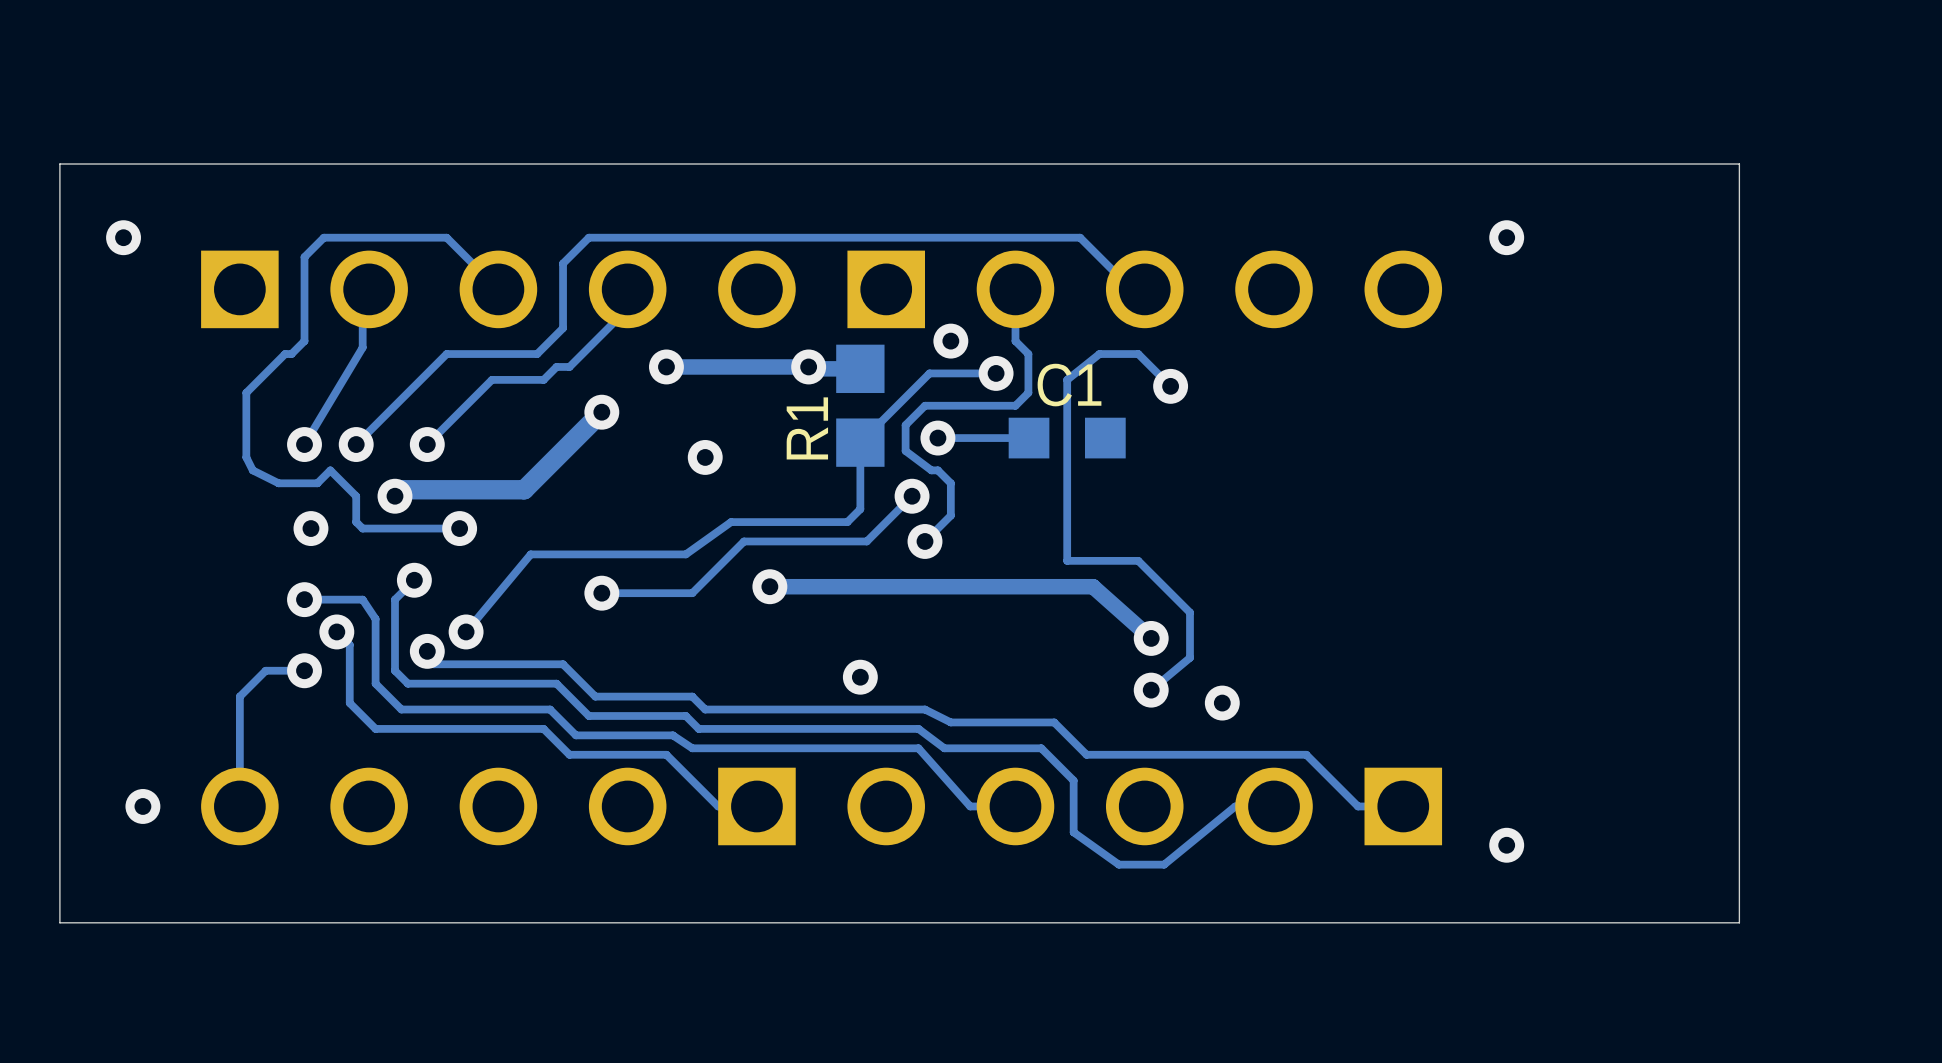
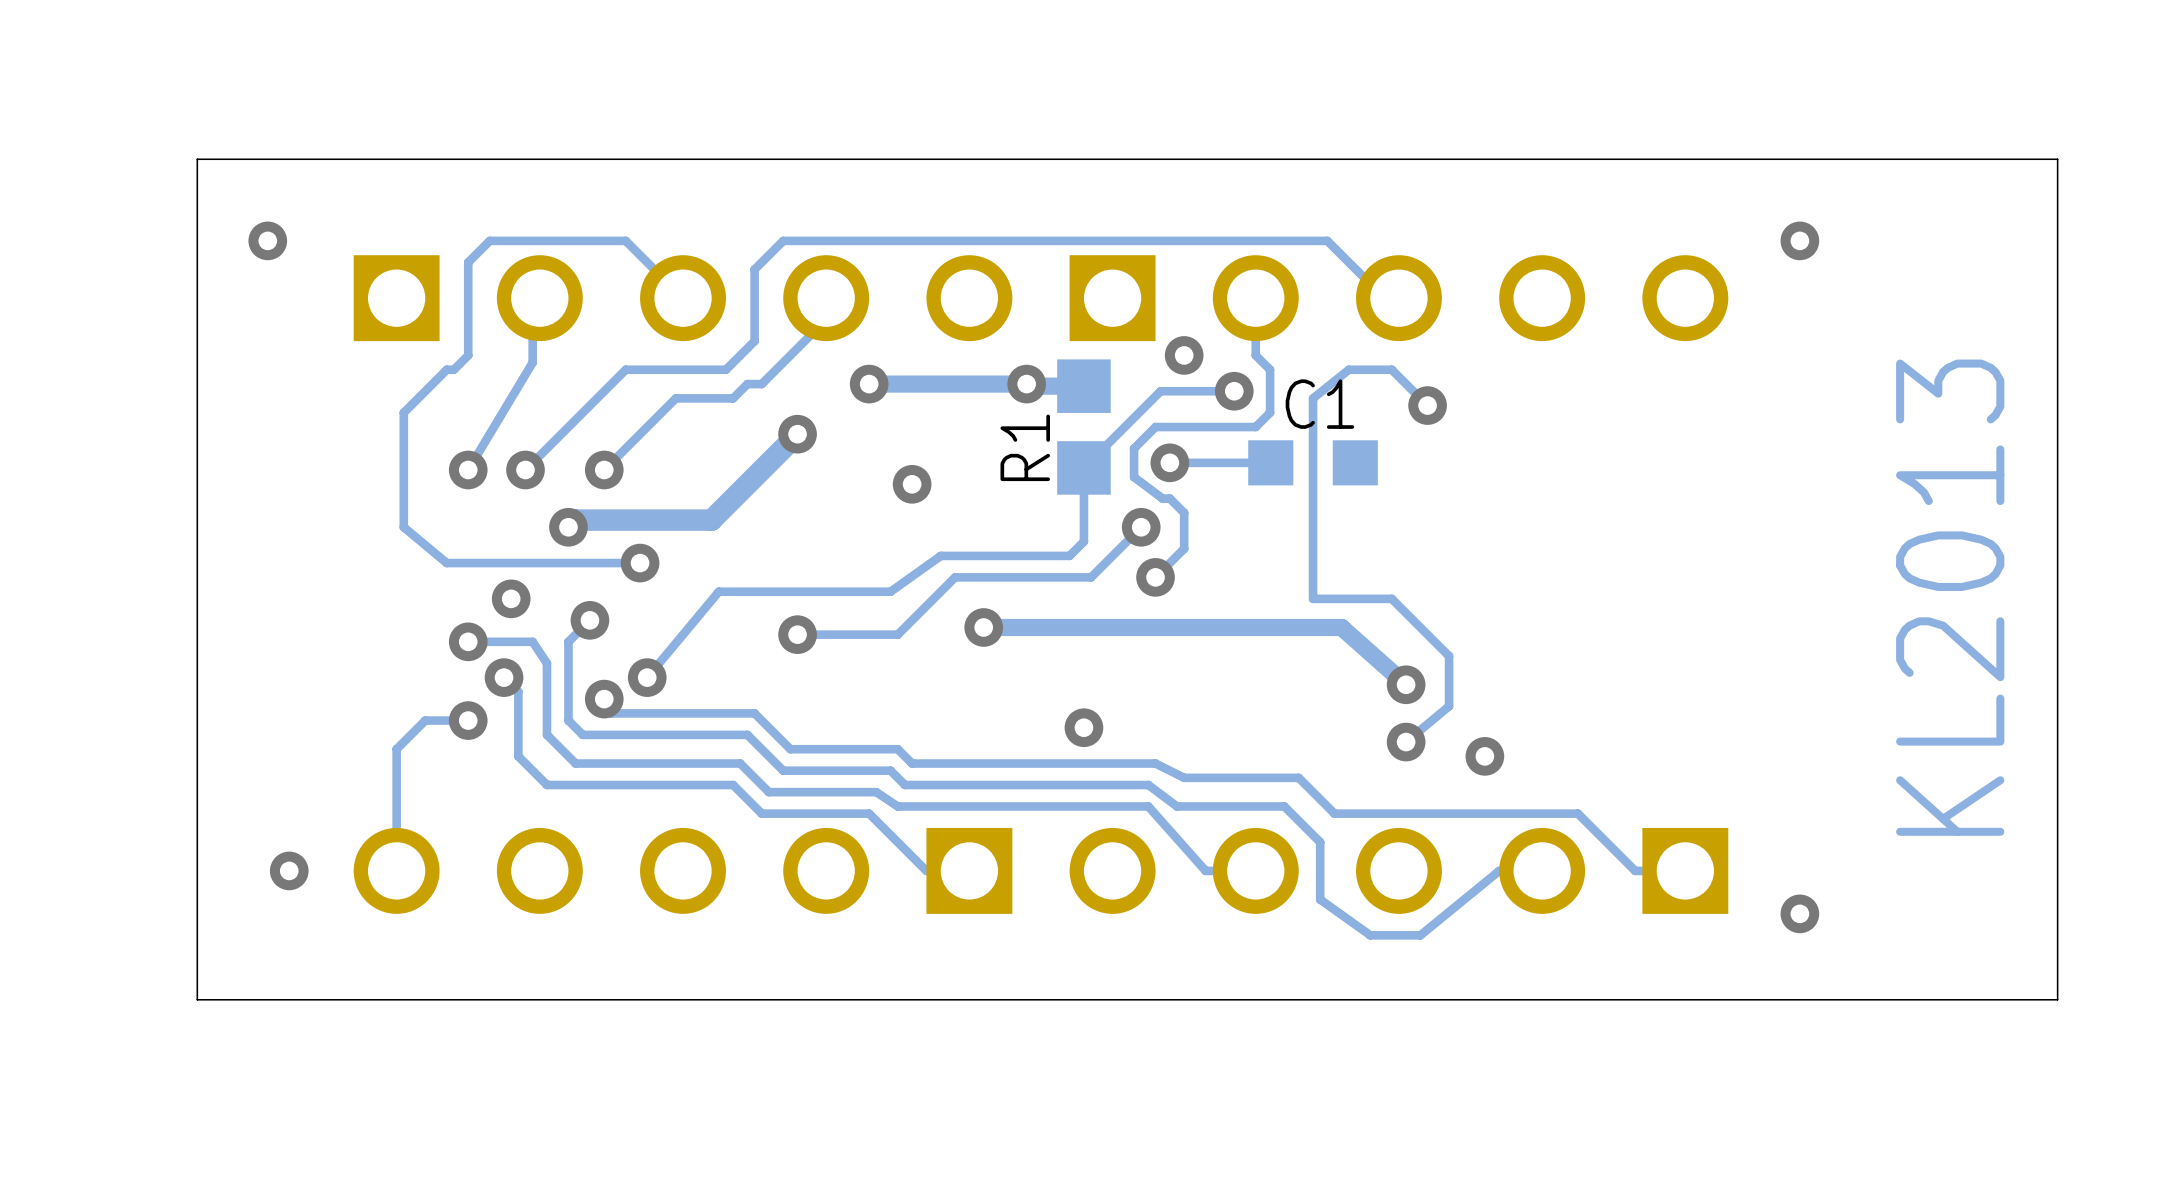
track: (246, 457) (252, 470) (278, 483) (317, 483) (330, 470) (356, 496) (356, 522) (362, 528) -> (403, 484) (403, 527) (446, 563) (532, 563)
via position: (310, 528) -> (511, 598)
text: none -> KL2013 (1950, 597)

